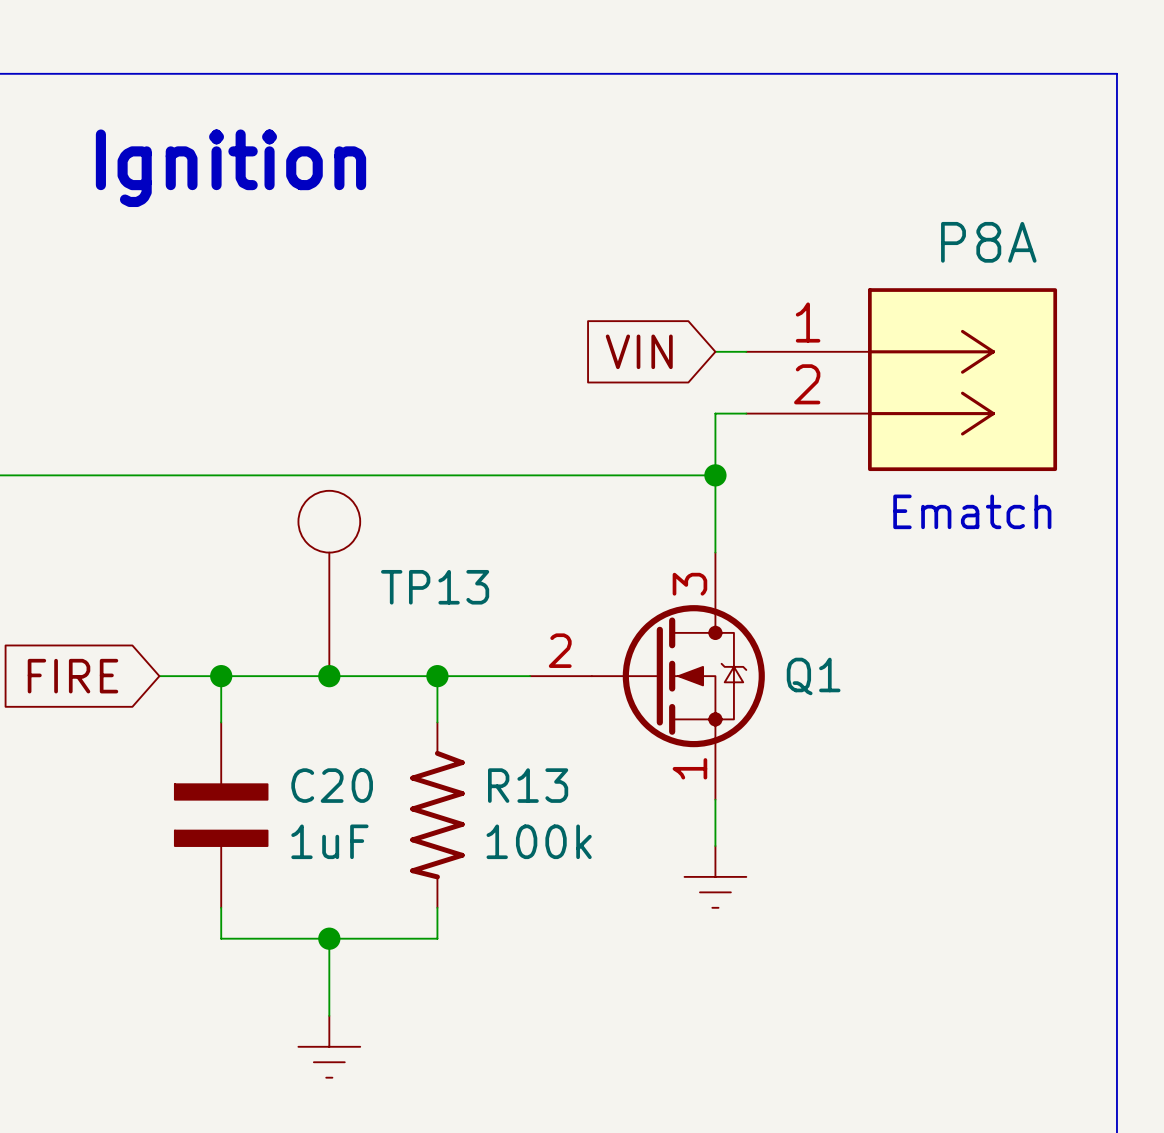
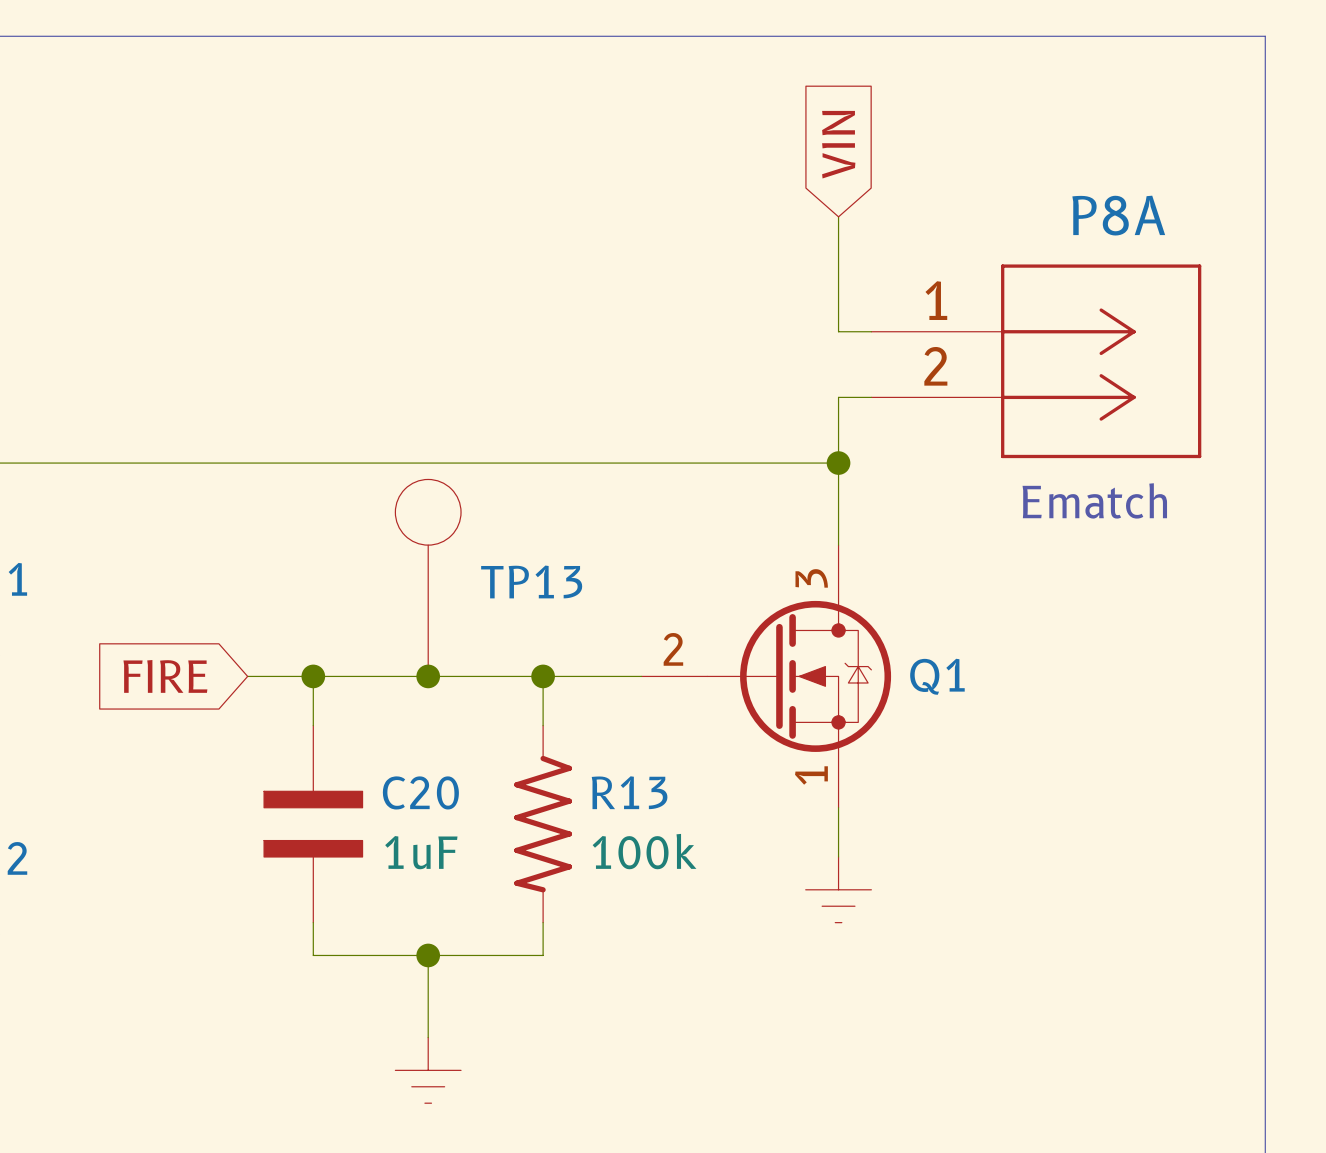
text: Ignition (231, 168) -> none
wire: none -> (838, 216) (838, 331)
P8A symbol: [746, 288, 1058, 472] -> [871, 264, 1202, 459]
global label rotation: 0° (639, 351) -> 90° clockwise (838, 144)
global label position: VIN (639, 351) -> VIN (838, 144)

